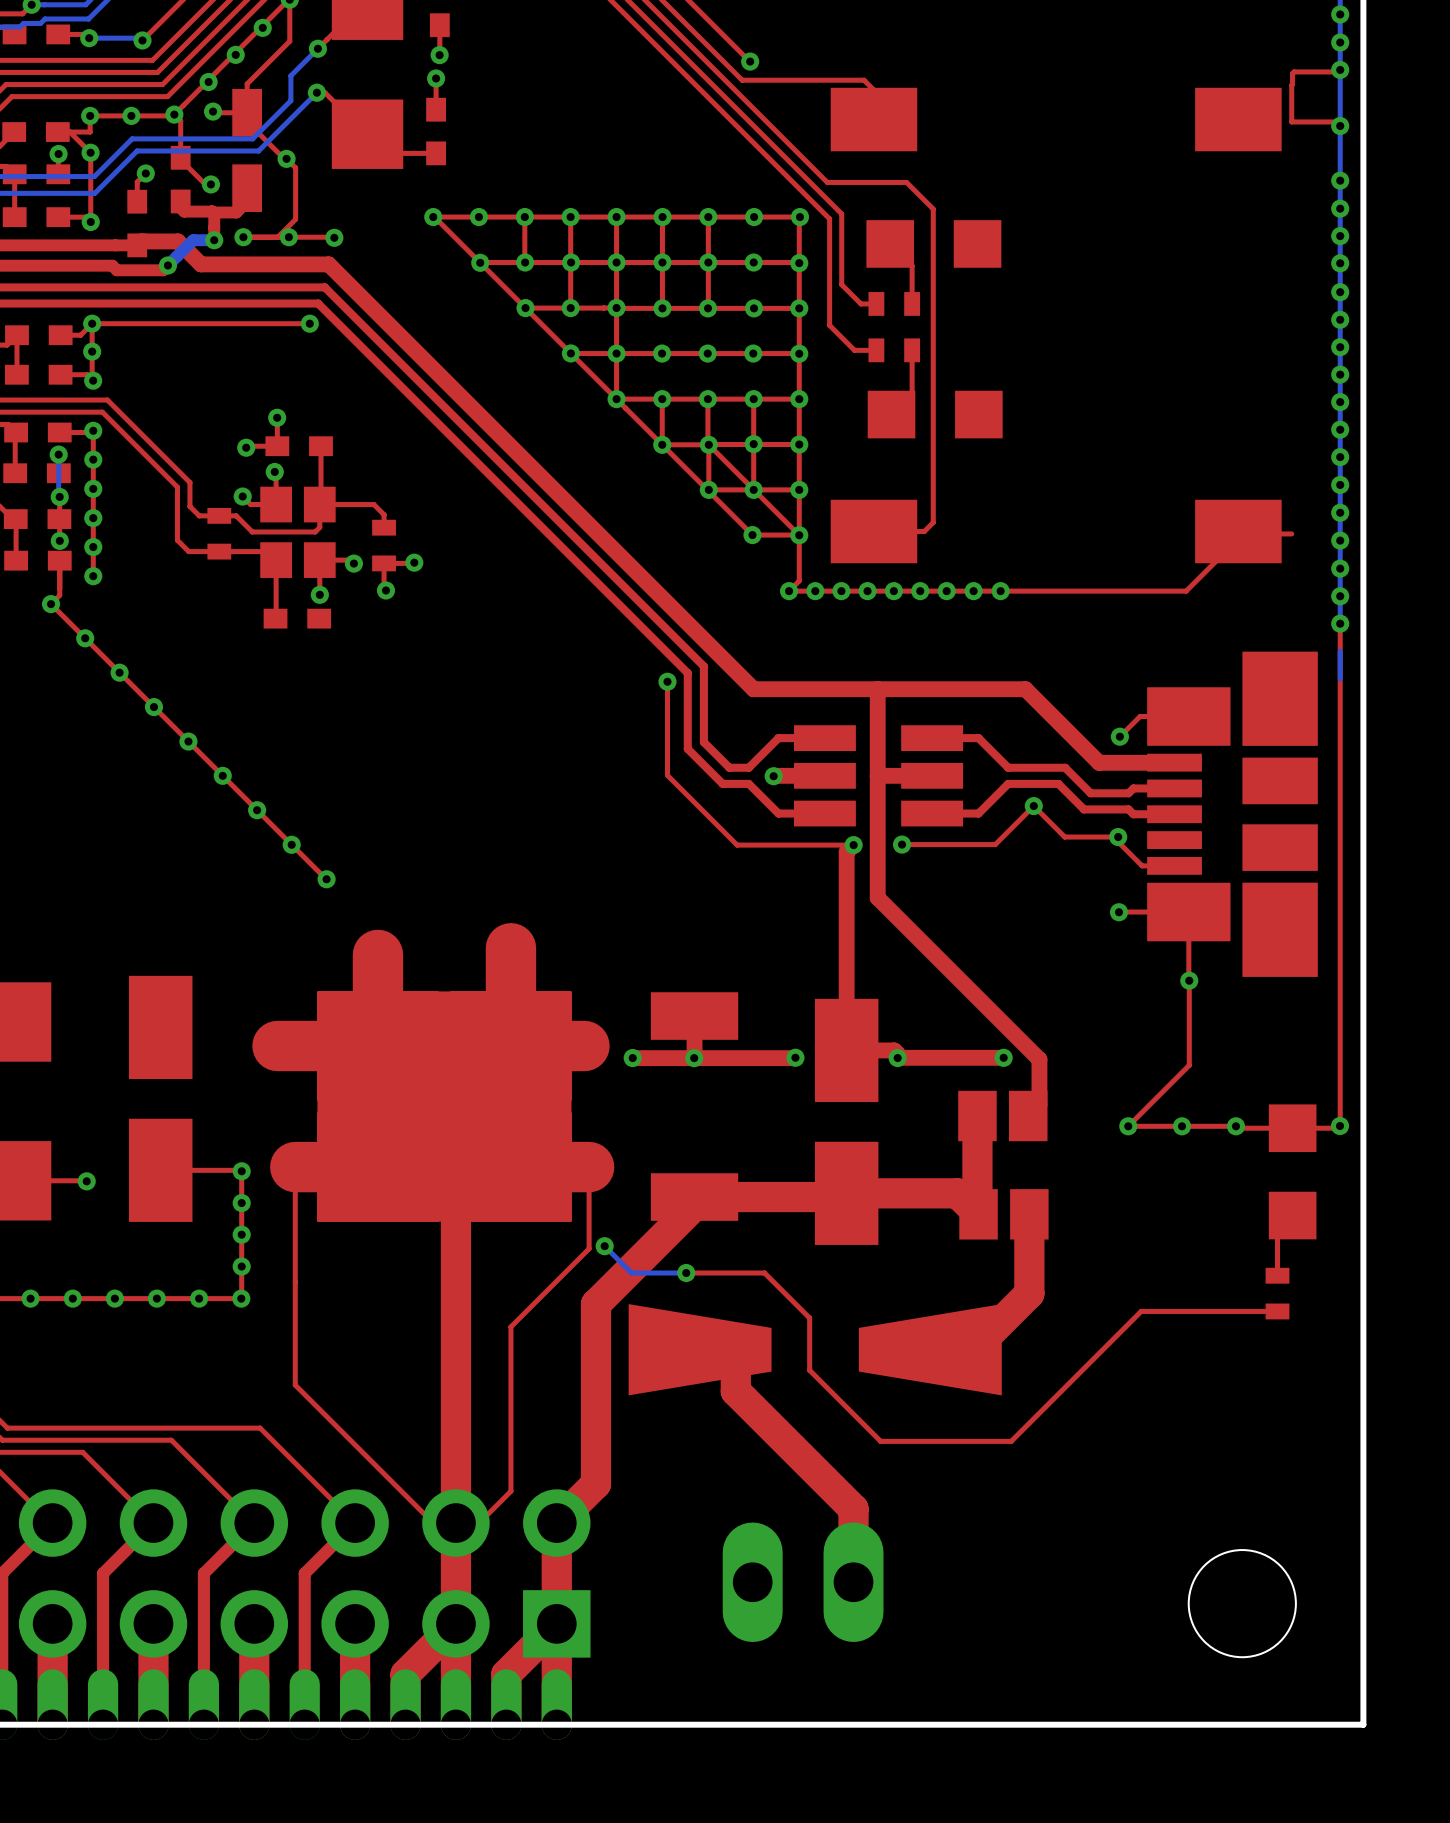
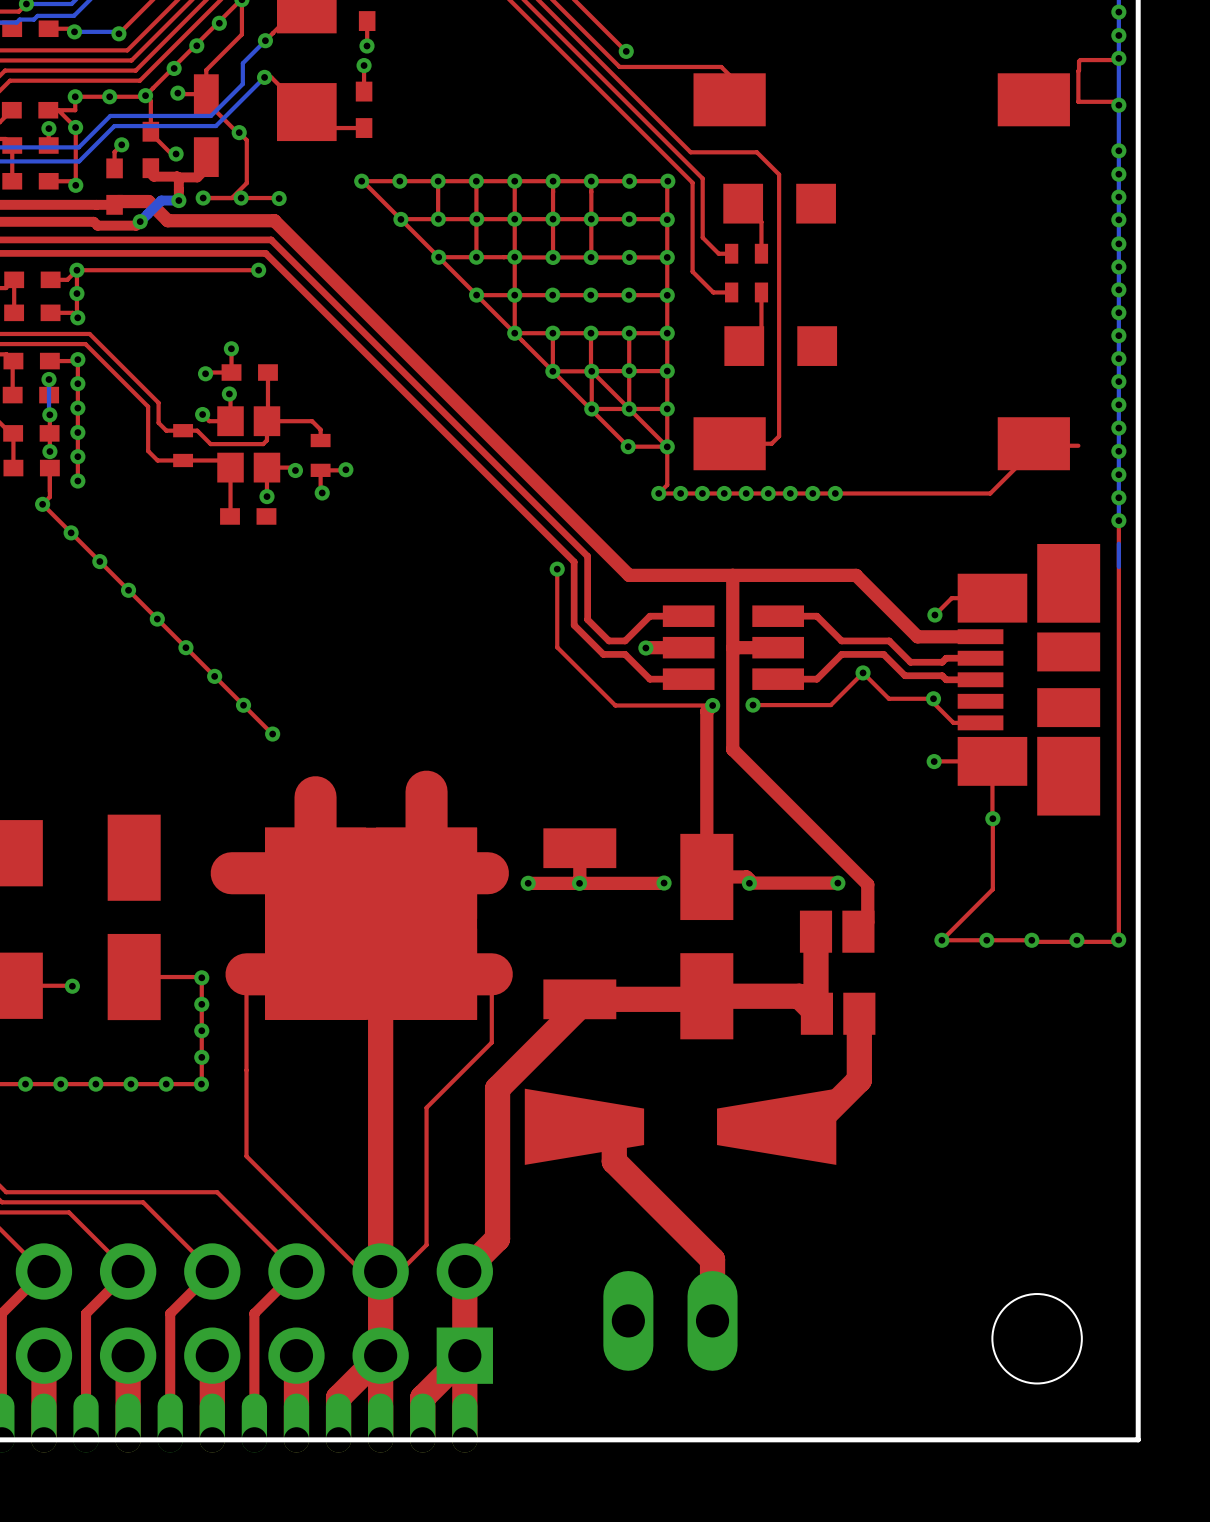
via: none -> (1076, 940)
part: (1292, 1171) -> none
top track: (1292, 1215) (1277, 1230) (1277, 1275) -> none
bottom track: (604, 1246) (631, 1273) (686, 1273) -> none
via: (604, 1246) -> none
top track: (686, 1273) (764, 1273) (809, 1318) (809, 1370) (880, 1441) (1011, 1441) (1141, 1311) (1277, 1311) -> none
via: (686, 1273) -> none
part: (1277, 1293) -> none

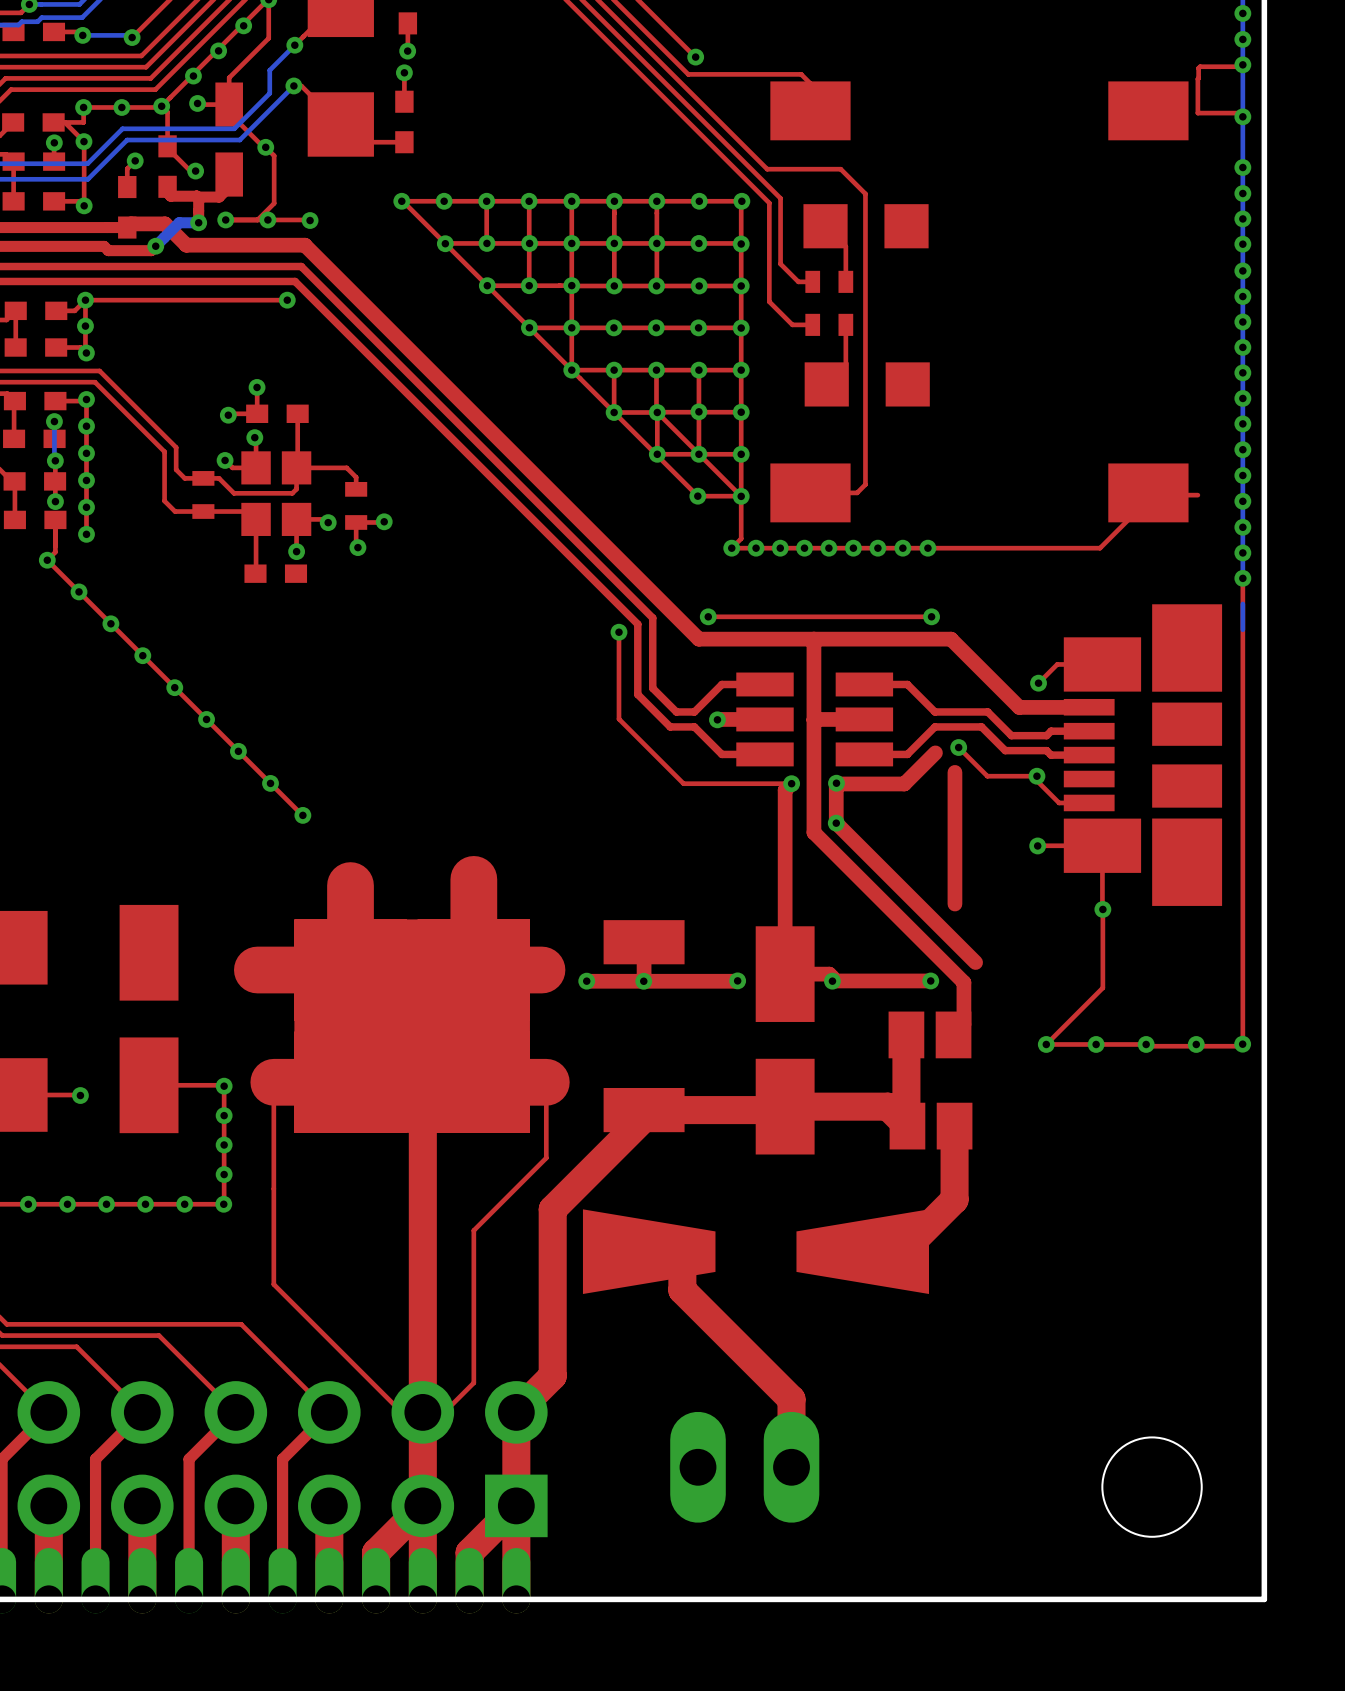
top track: none -> (708, 616) (934, 617)
via: none -> (708, 616)
via: none -> (931, 616)
top track: (863, 672) (830, 705) (753, 705) -> none
top track: none -> (935, 752) (904, 783) (836, 783) (836, 823) (975, 962)
top track: none -> (954, 772) (954, 904)
via: none -> (836, 823)

